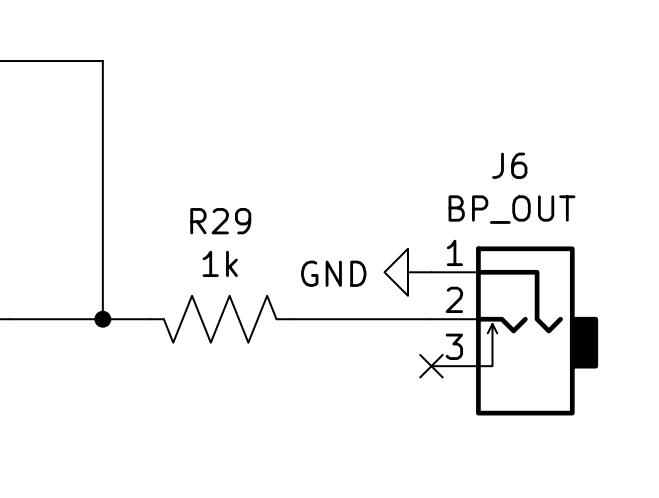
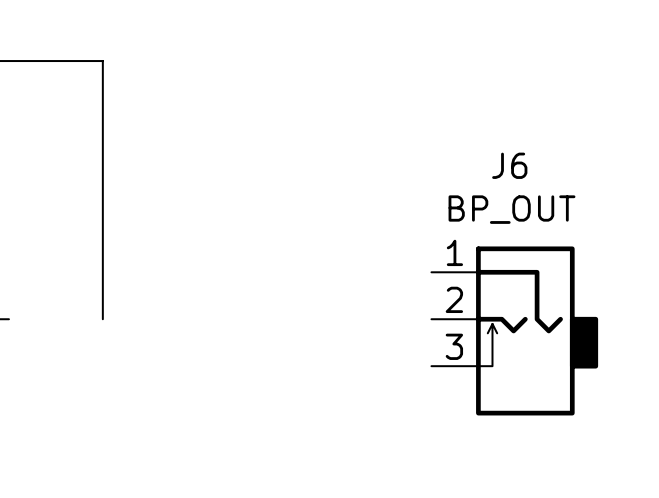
power symbol: GND (407, 272) -> none
wire: (8, 319) (149, 319) -> none
junction: (102, 319) -> none
R29: 1k (220, 319) -> none
wire: (290, 319) (431, 319) -> none
no-connect mark: (431, 366) -> none

